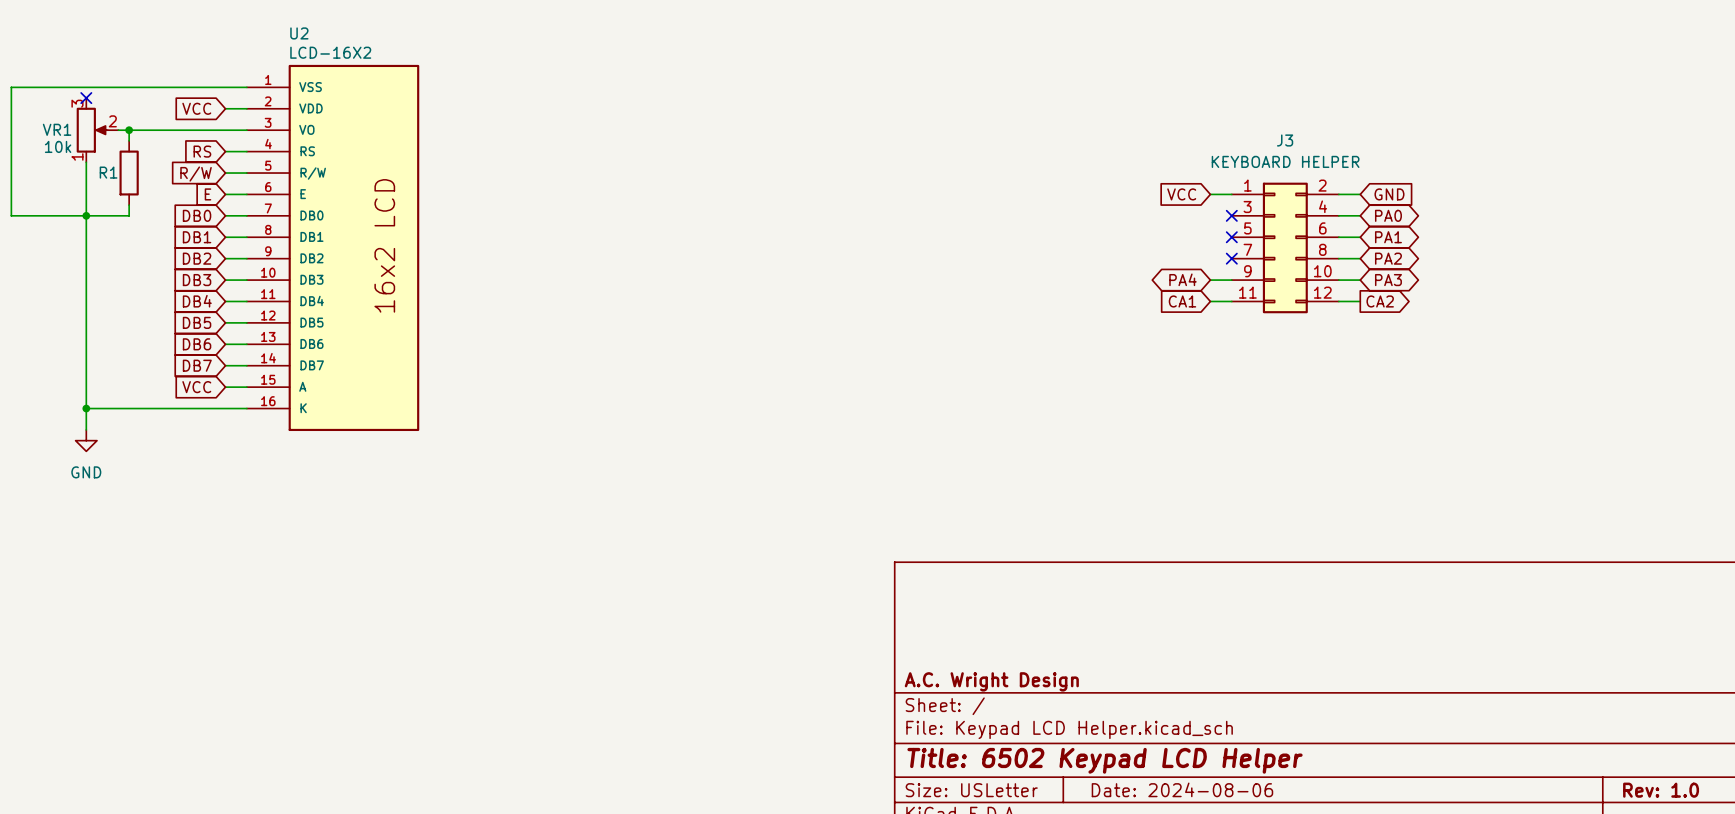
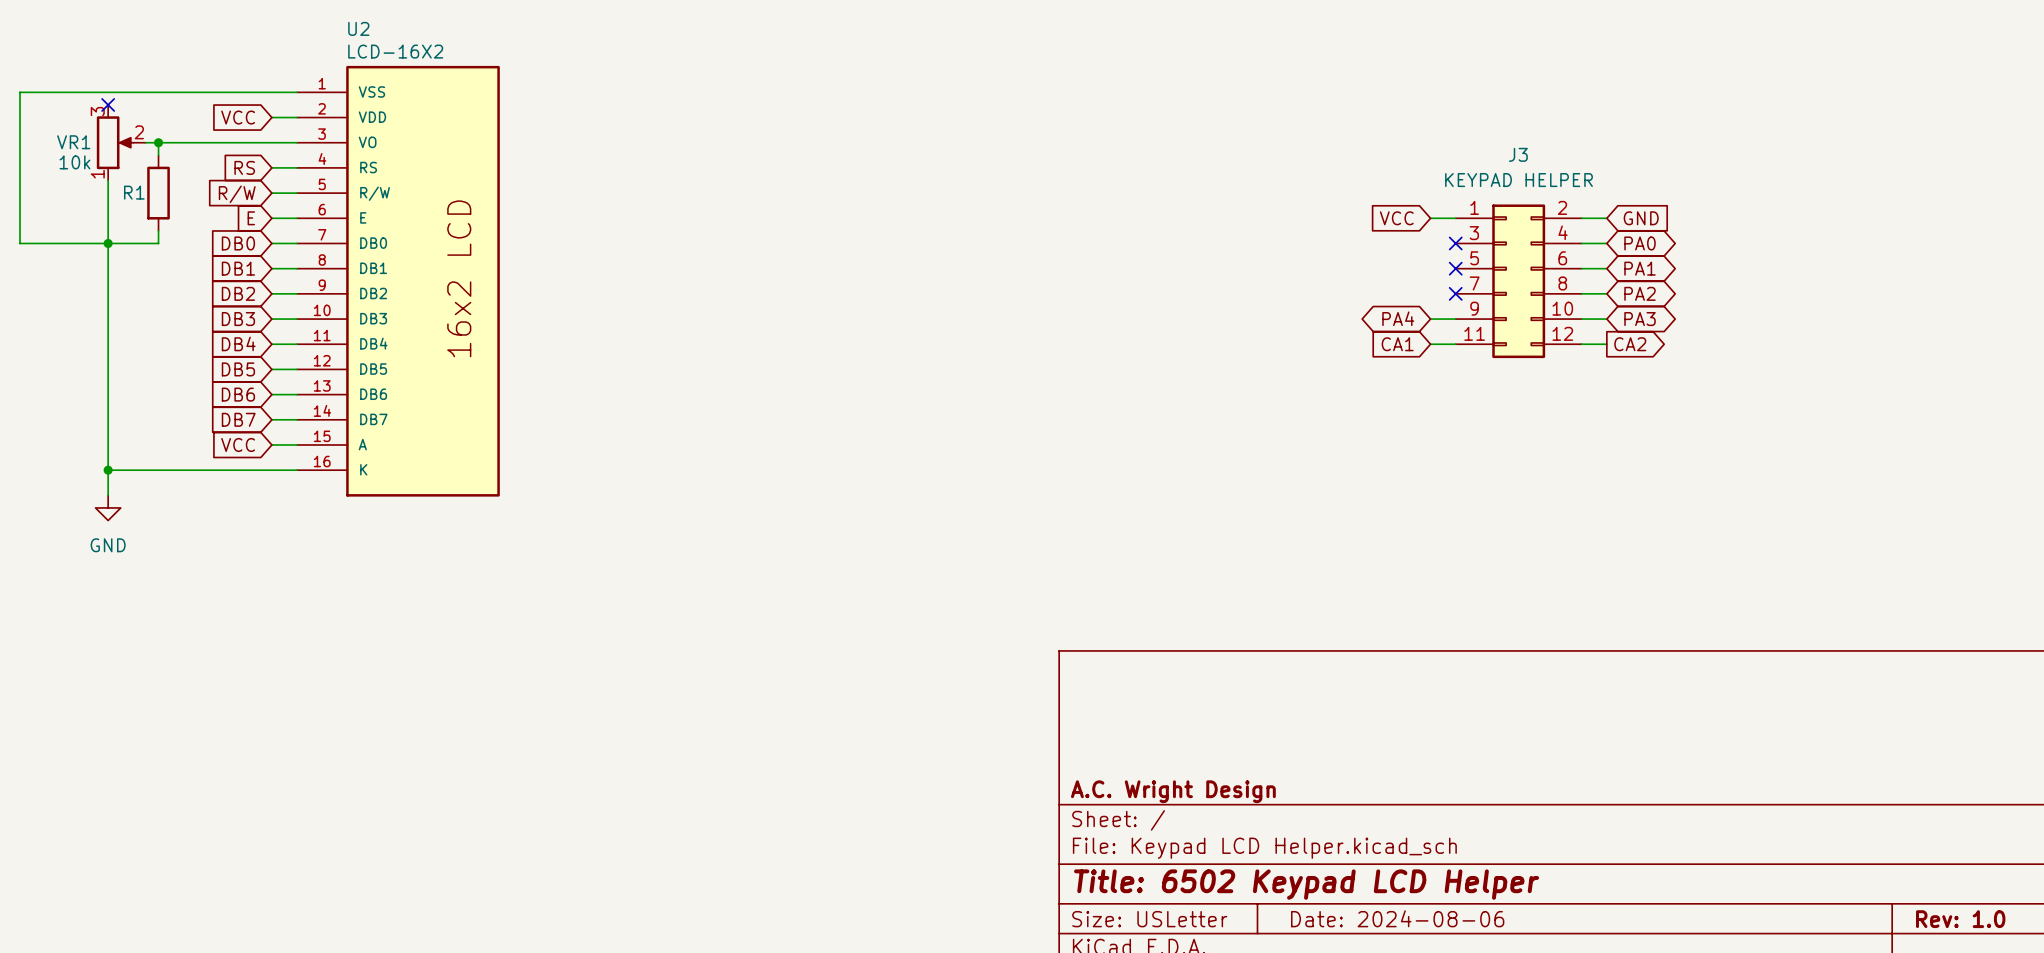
J3 value: KEYBOARD HELPER (1285, 161) -> KEYPAD HELPER (1518, 180)

